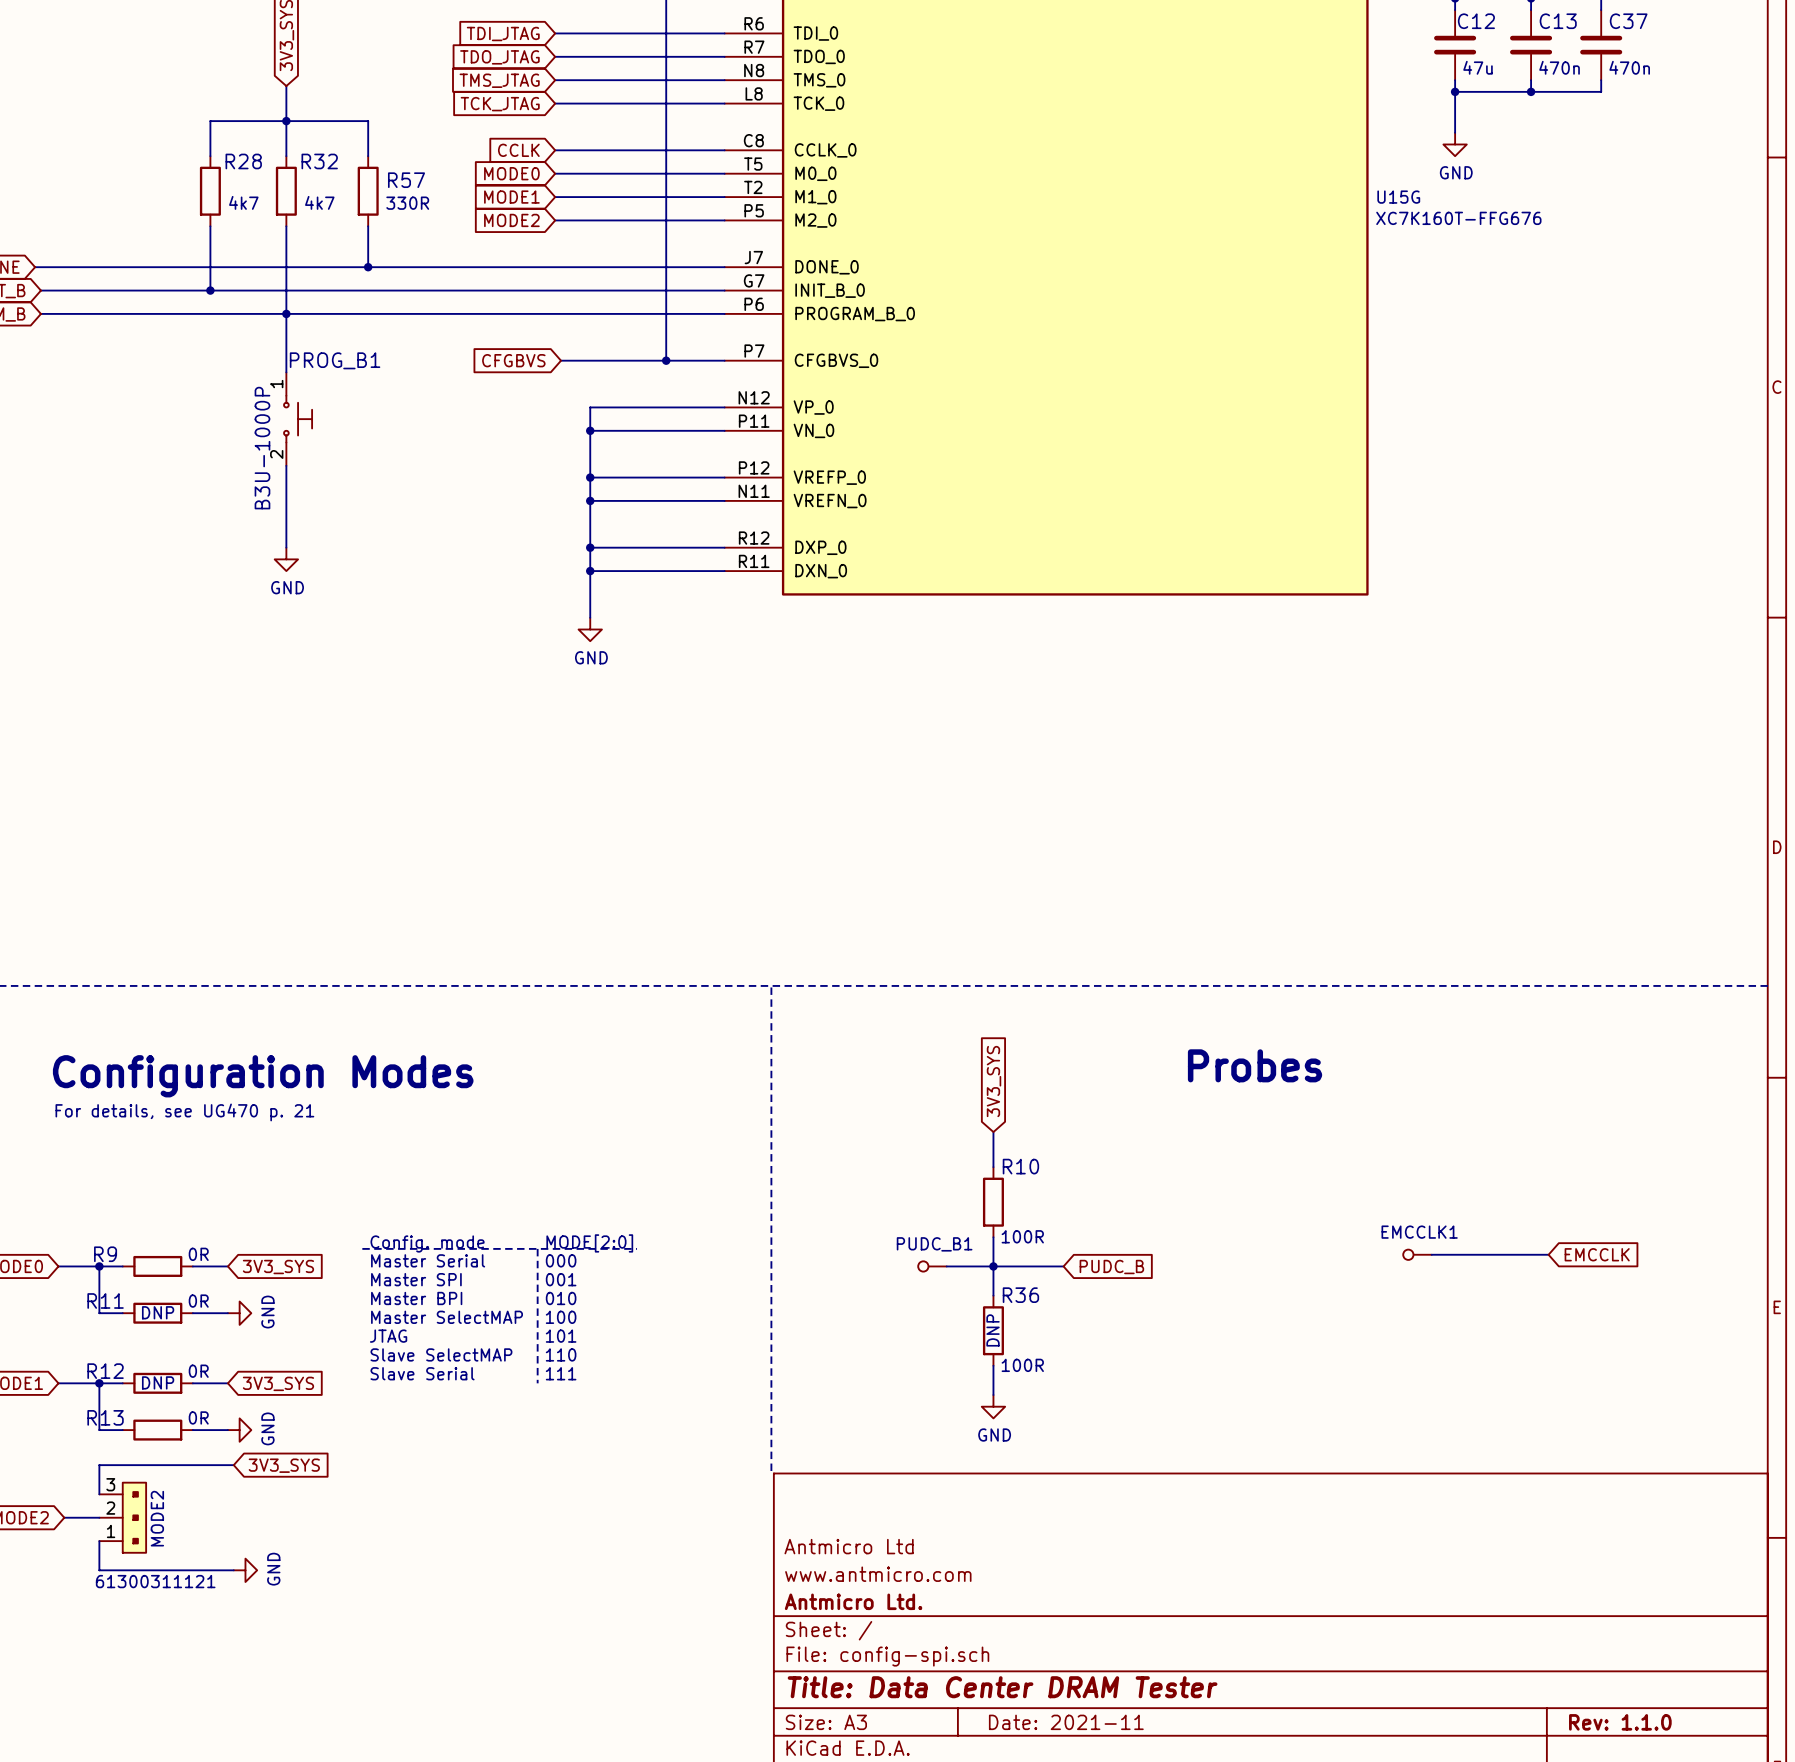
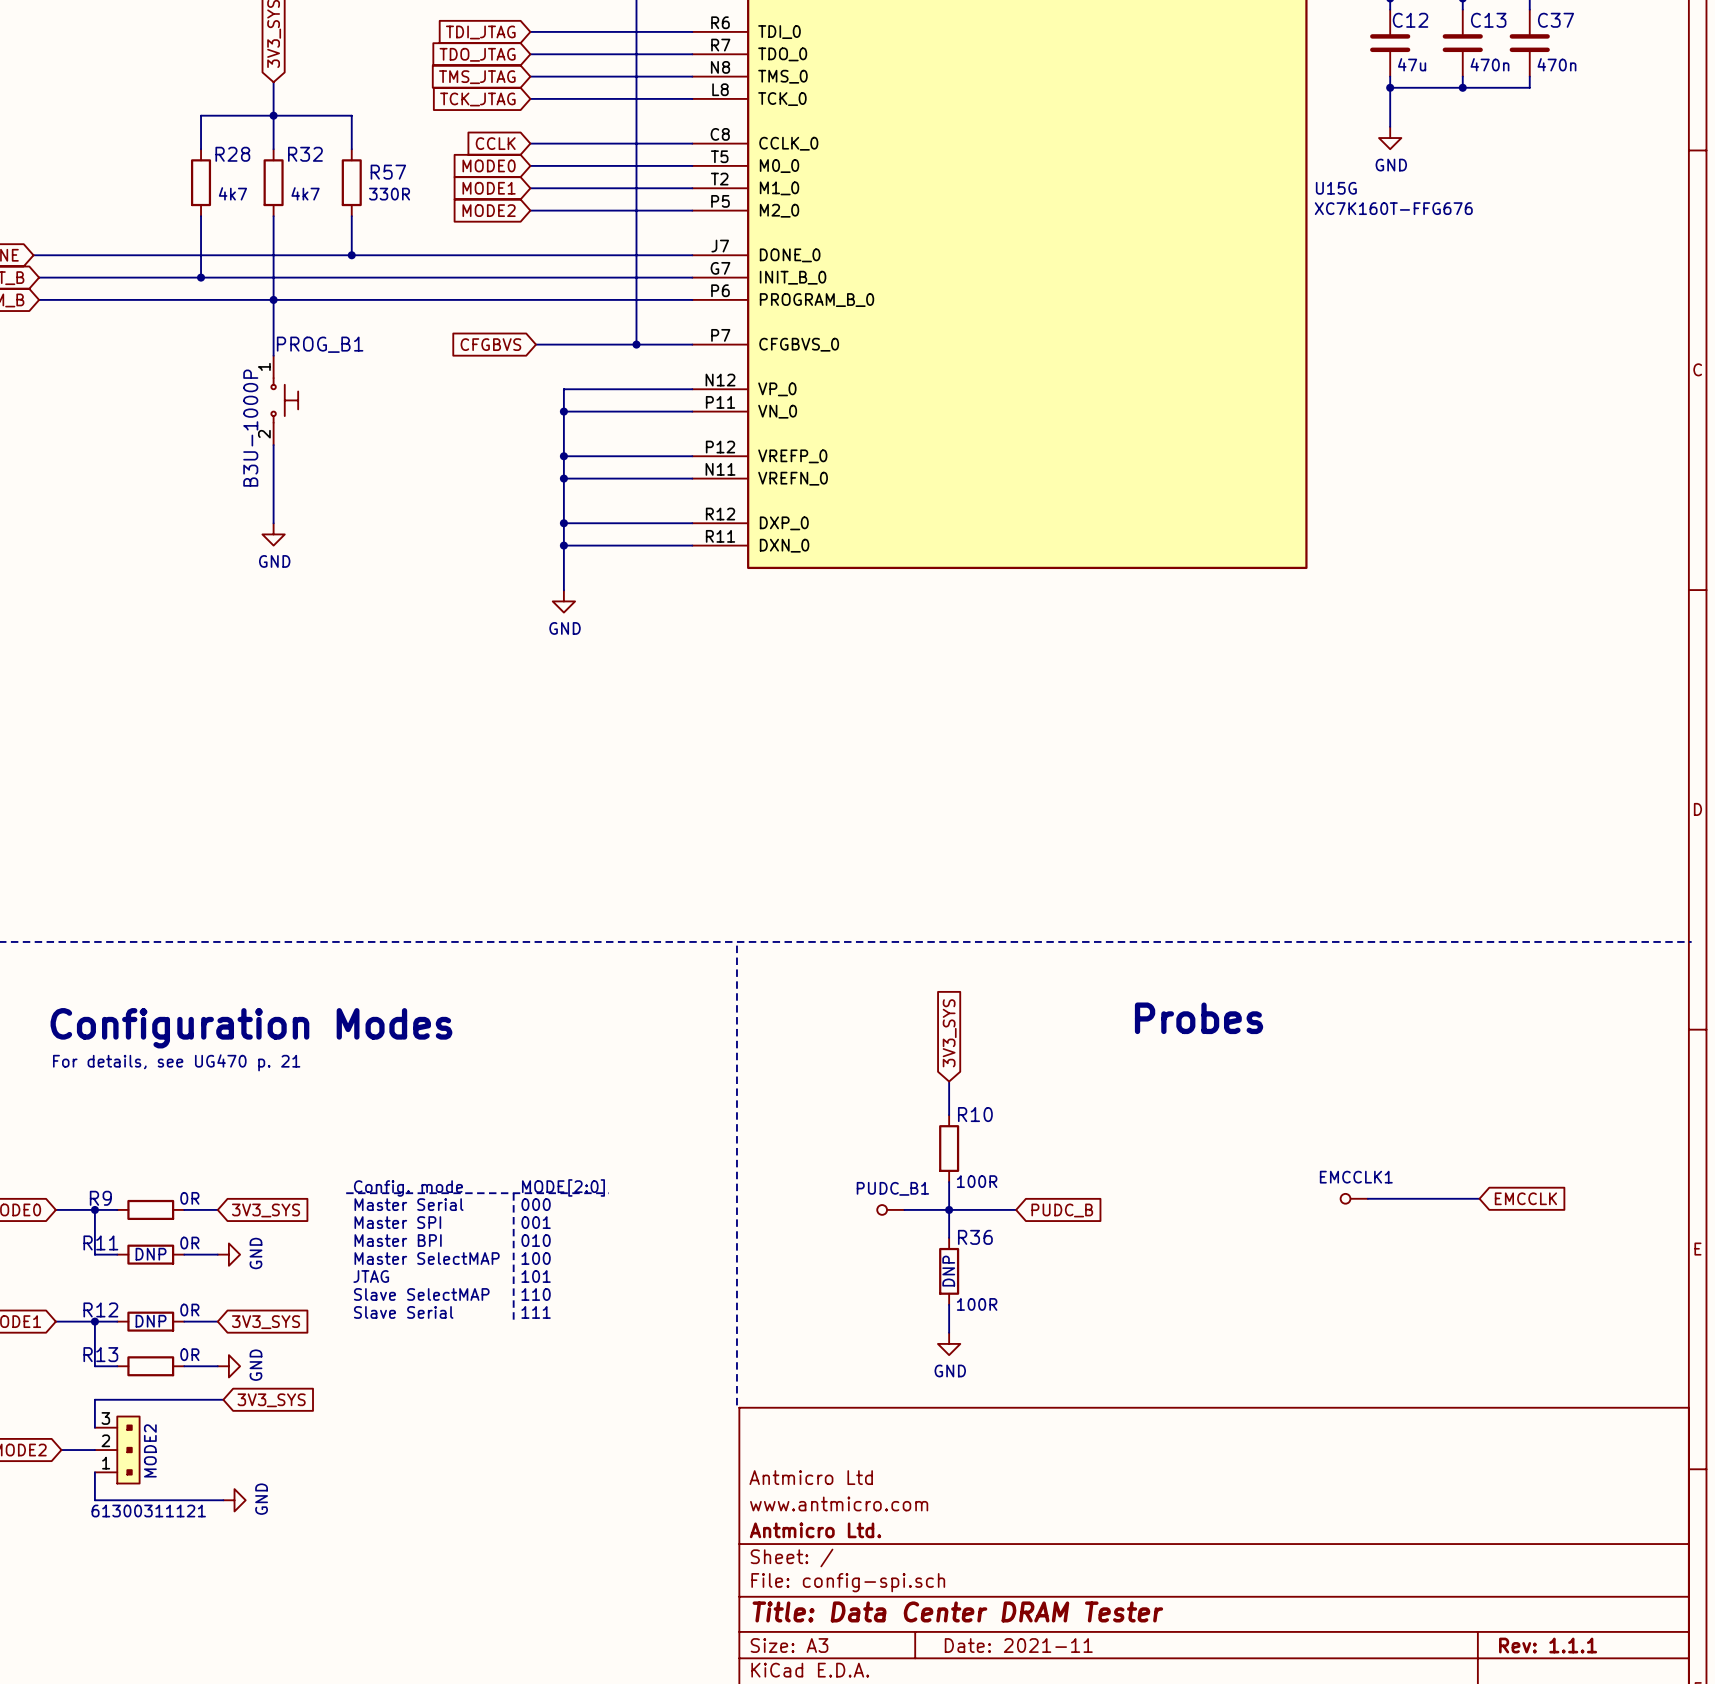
title block: Rev: 1.1.0 (1620, 1722) -> Rev: 1.1.1 (1548, 1645)

